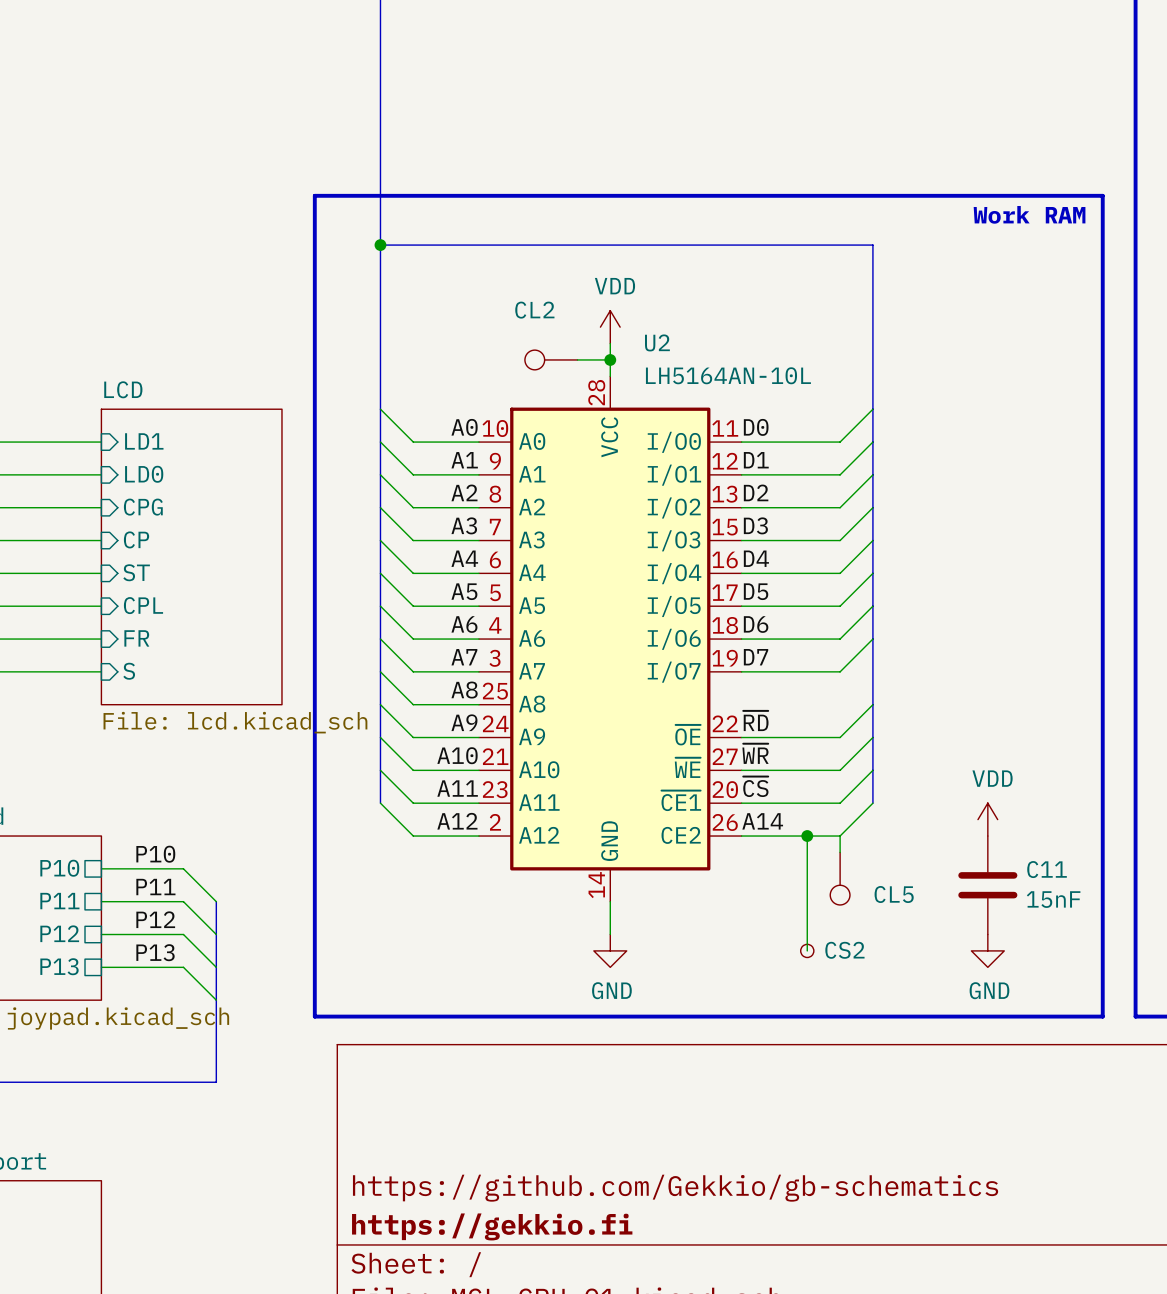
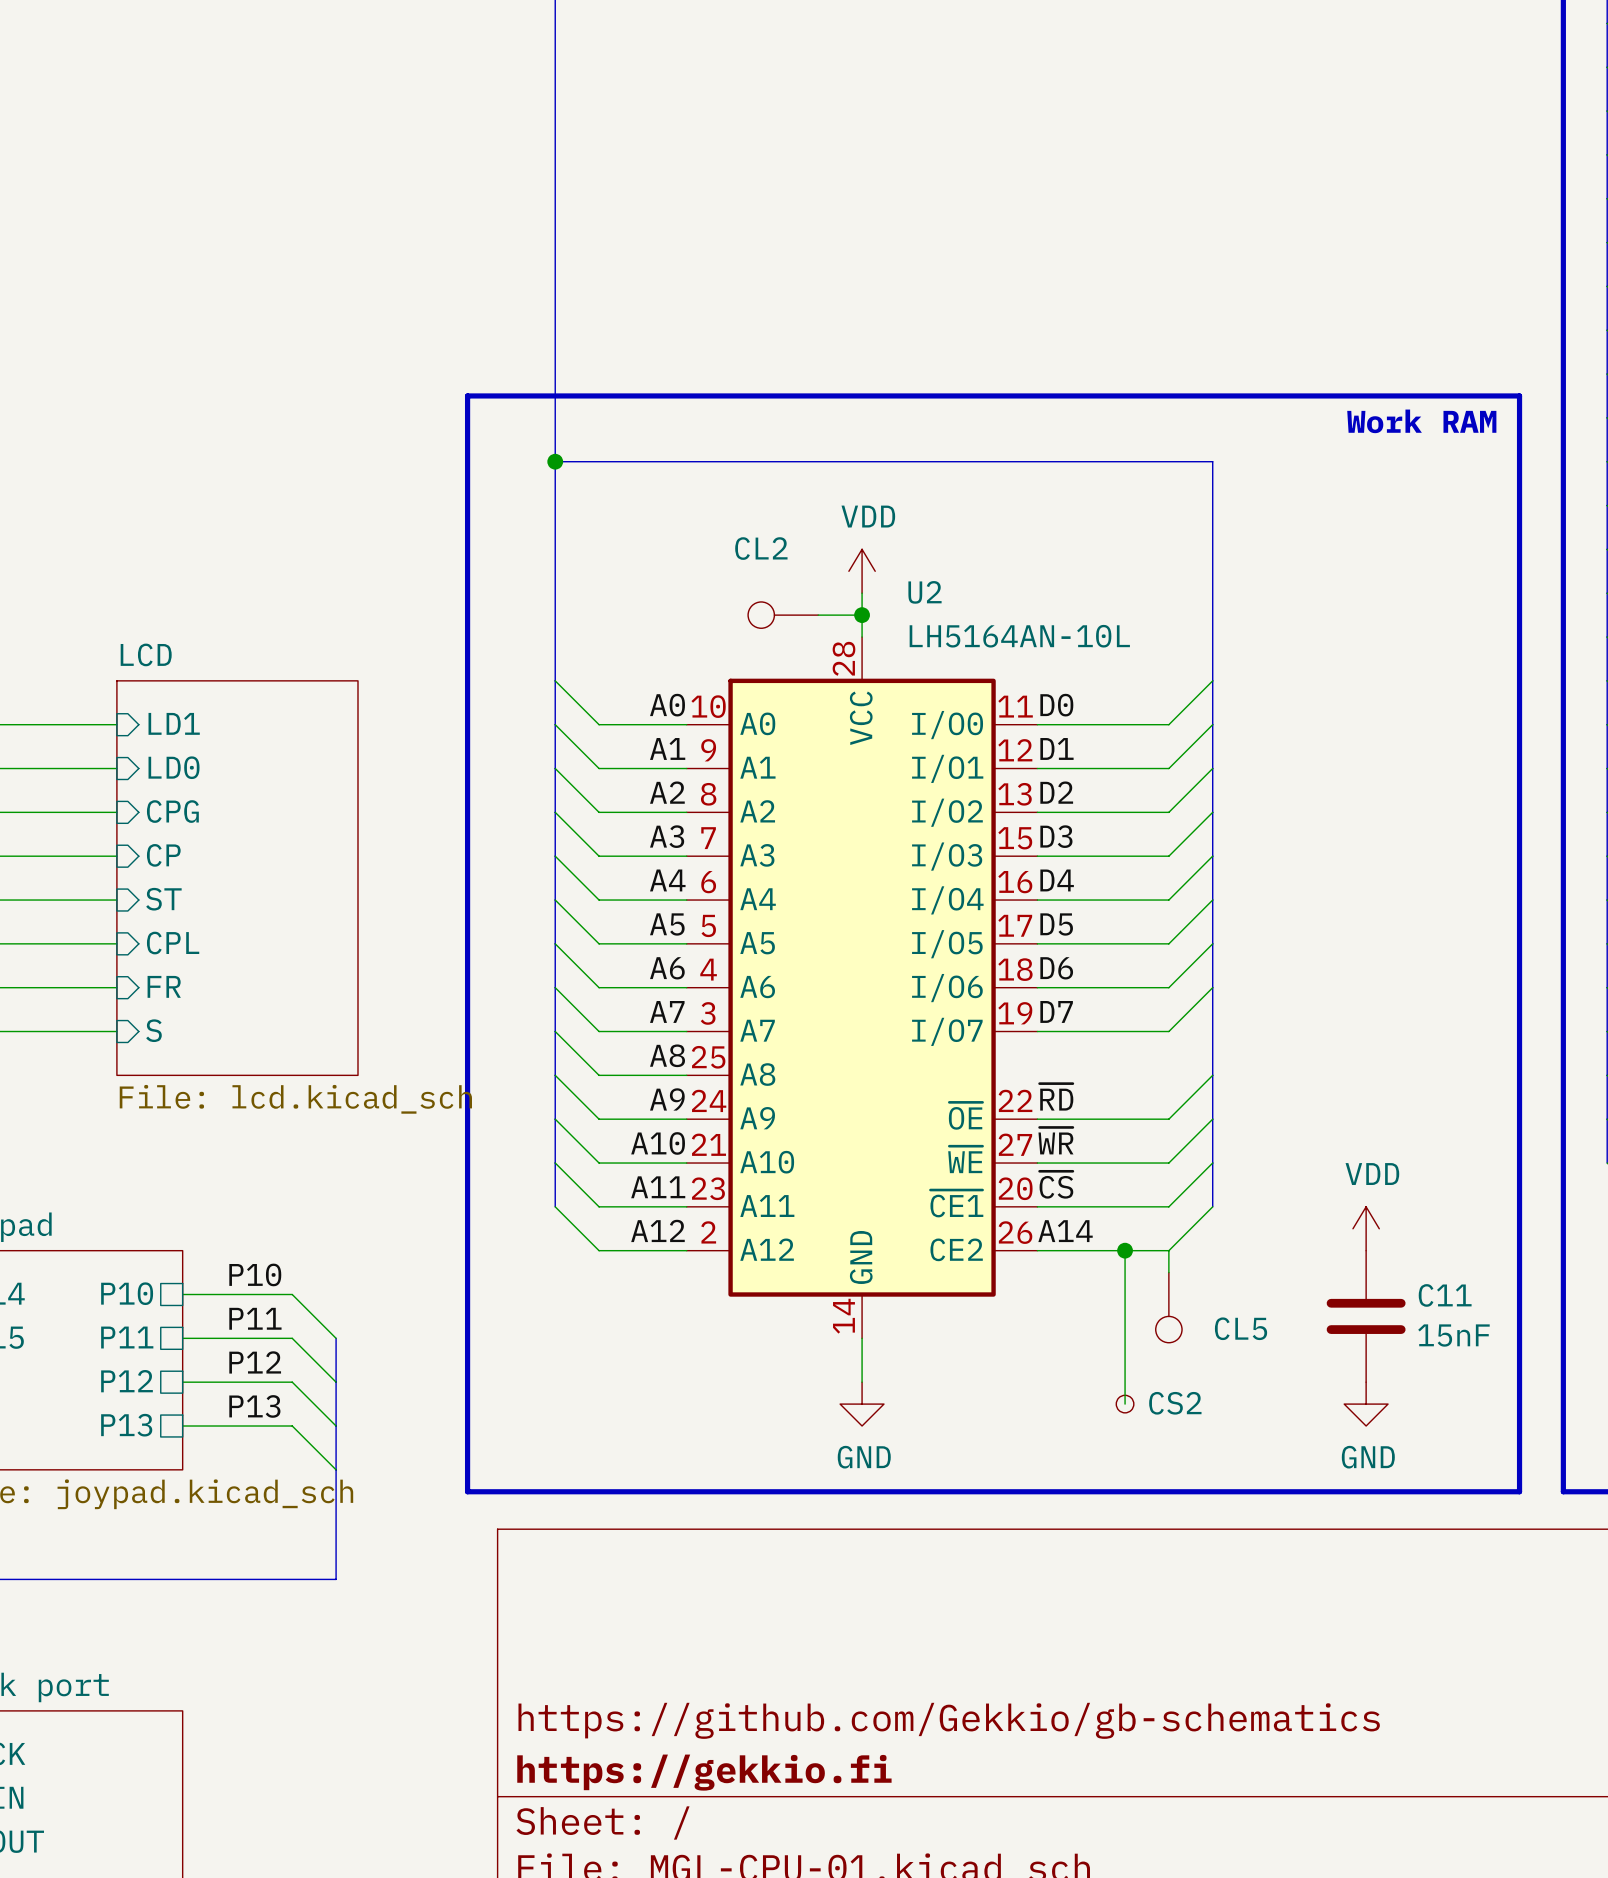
sheet pin position: LD1 (144, 441) -> LD1 (174, 723)
wire: (52, 442) (101, 442) -> none
wire: (52, 474) (101, 474) -> none
sheet pin position: LD0 (144, 474) -> LD0 (174, 767)
wire: (52, 507) (101, 507) -> none
sheet pin position: CPG (143, 507) -> CPG (172, 811)
sheet pin position: CP (136, 539) -> CP (163, 855)
wire: (52, 540) (101, 540) -> none
sheet LCD position: (191, 556) -> (237, 878)
sheet pin position: ST (136, 572) -> ST (163, 899)
wire: (52, 573) (101, 573) -> none
sheet pin position: CPL (143, 605) -> CPL (173, 943)
wire: (52, 606) (101, 606) -> none
sheet pin position: FR (136, 638) -> FR (164, 986)
wire: (52, 639) (101, 639) -> none
wire: (52, 671) (101, 671) -> none
sheet pin position: S (129, 671) -> S (153, 1030)

